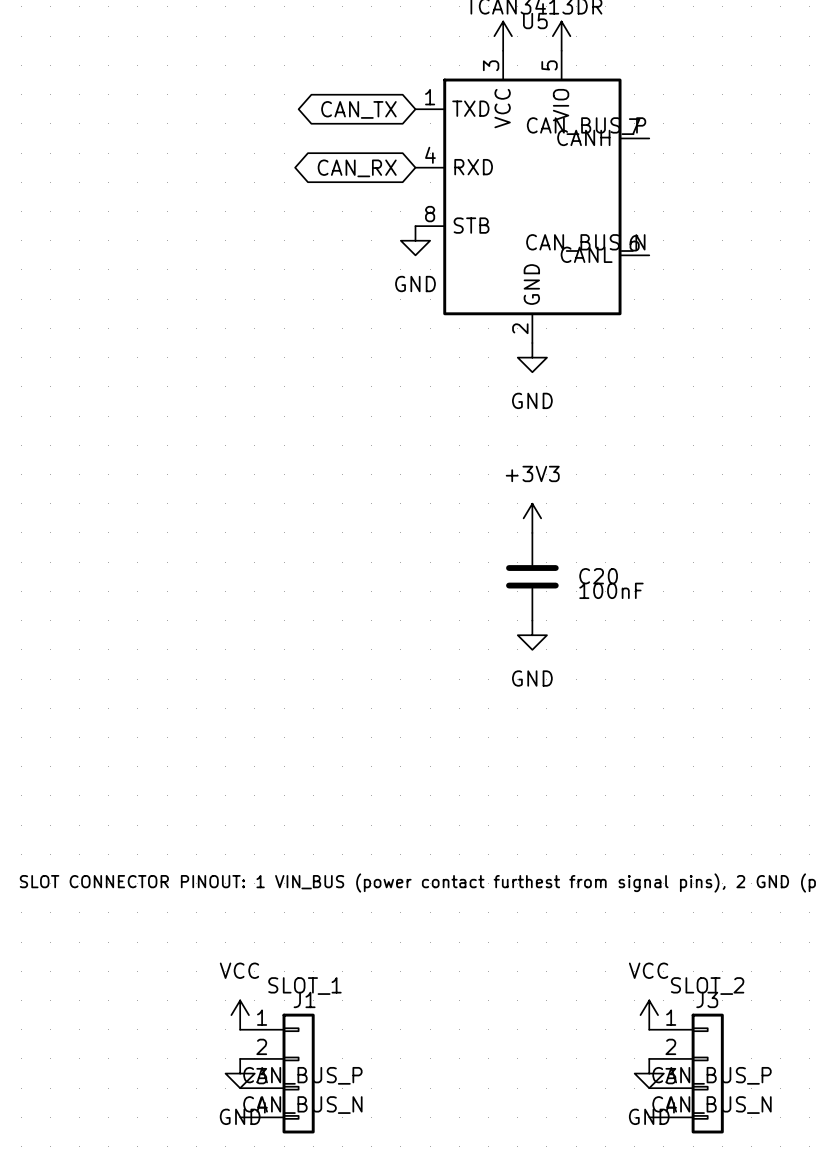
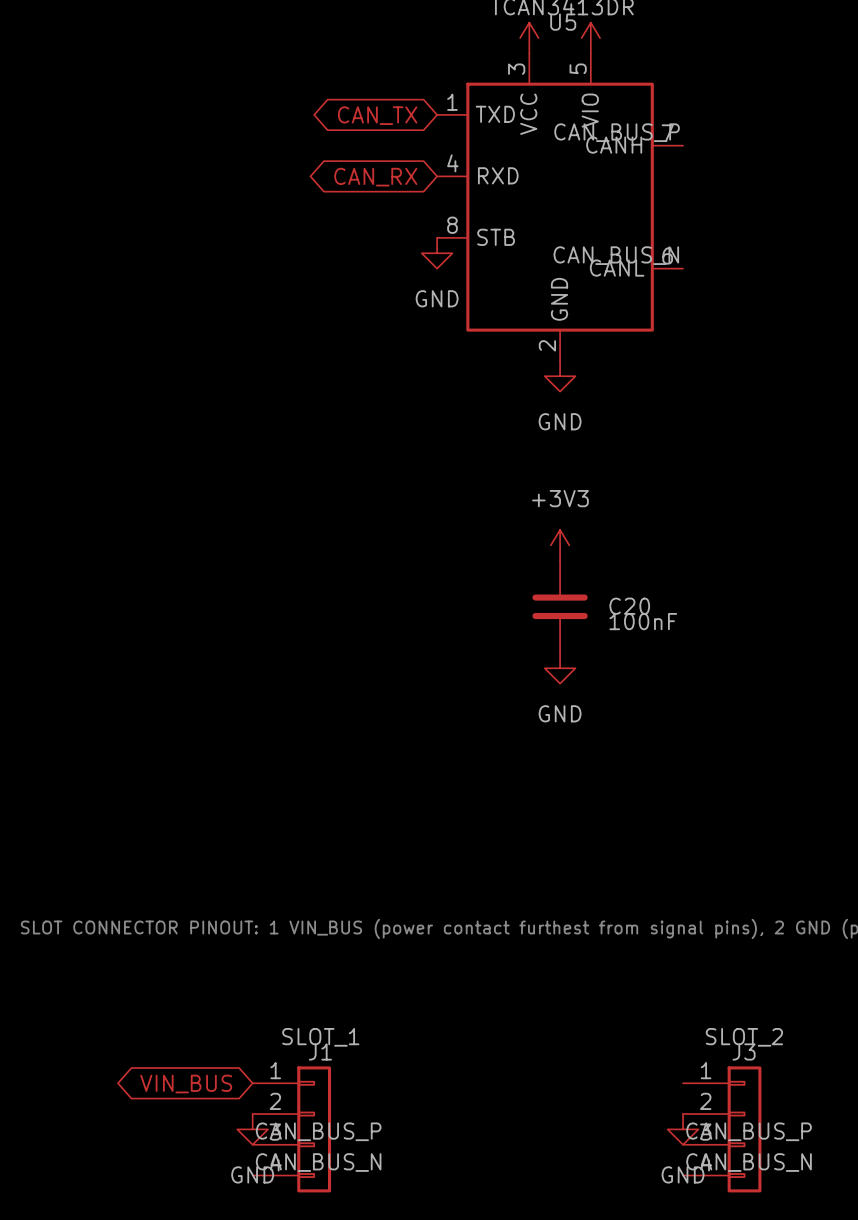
power symbol: VCC (240, 1015) -> none
power symbol: VCC (649, 1015) -> none
global label: none -> VIN_BUS (186, 1084)

